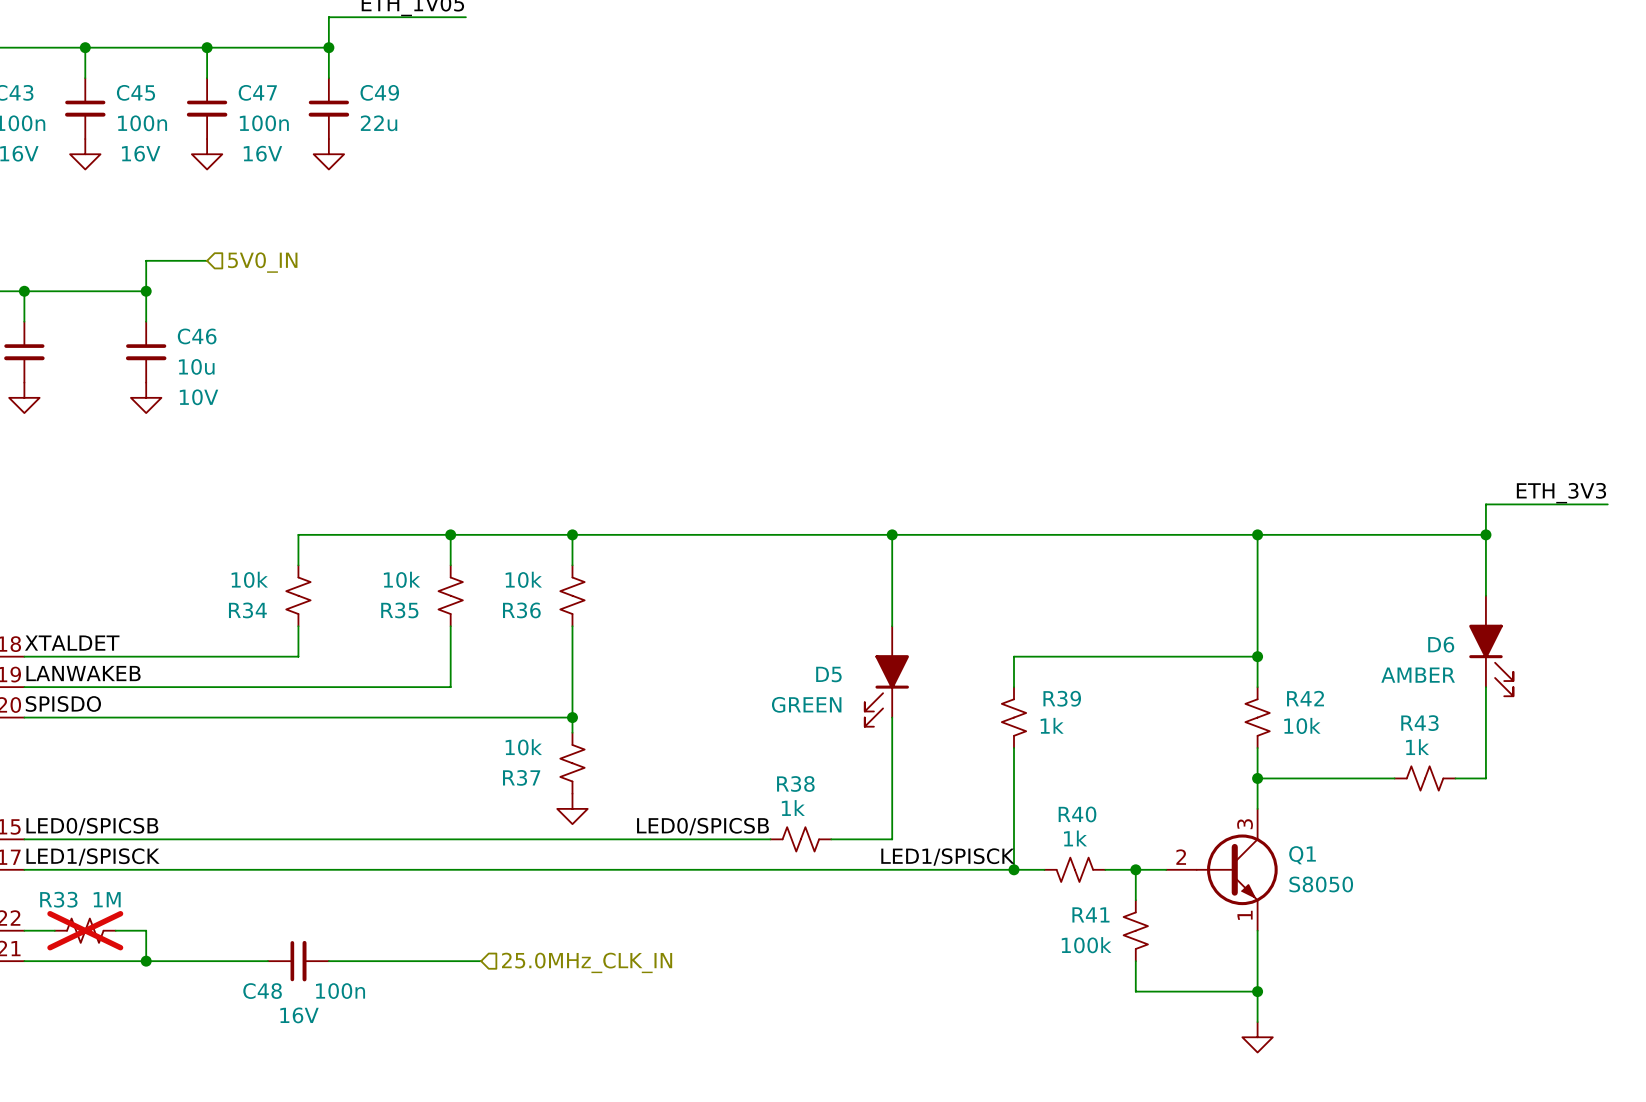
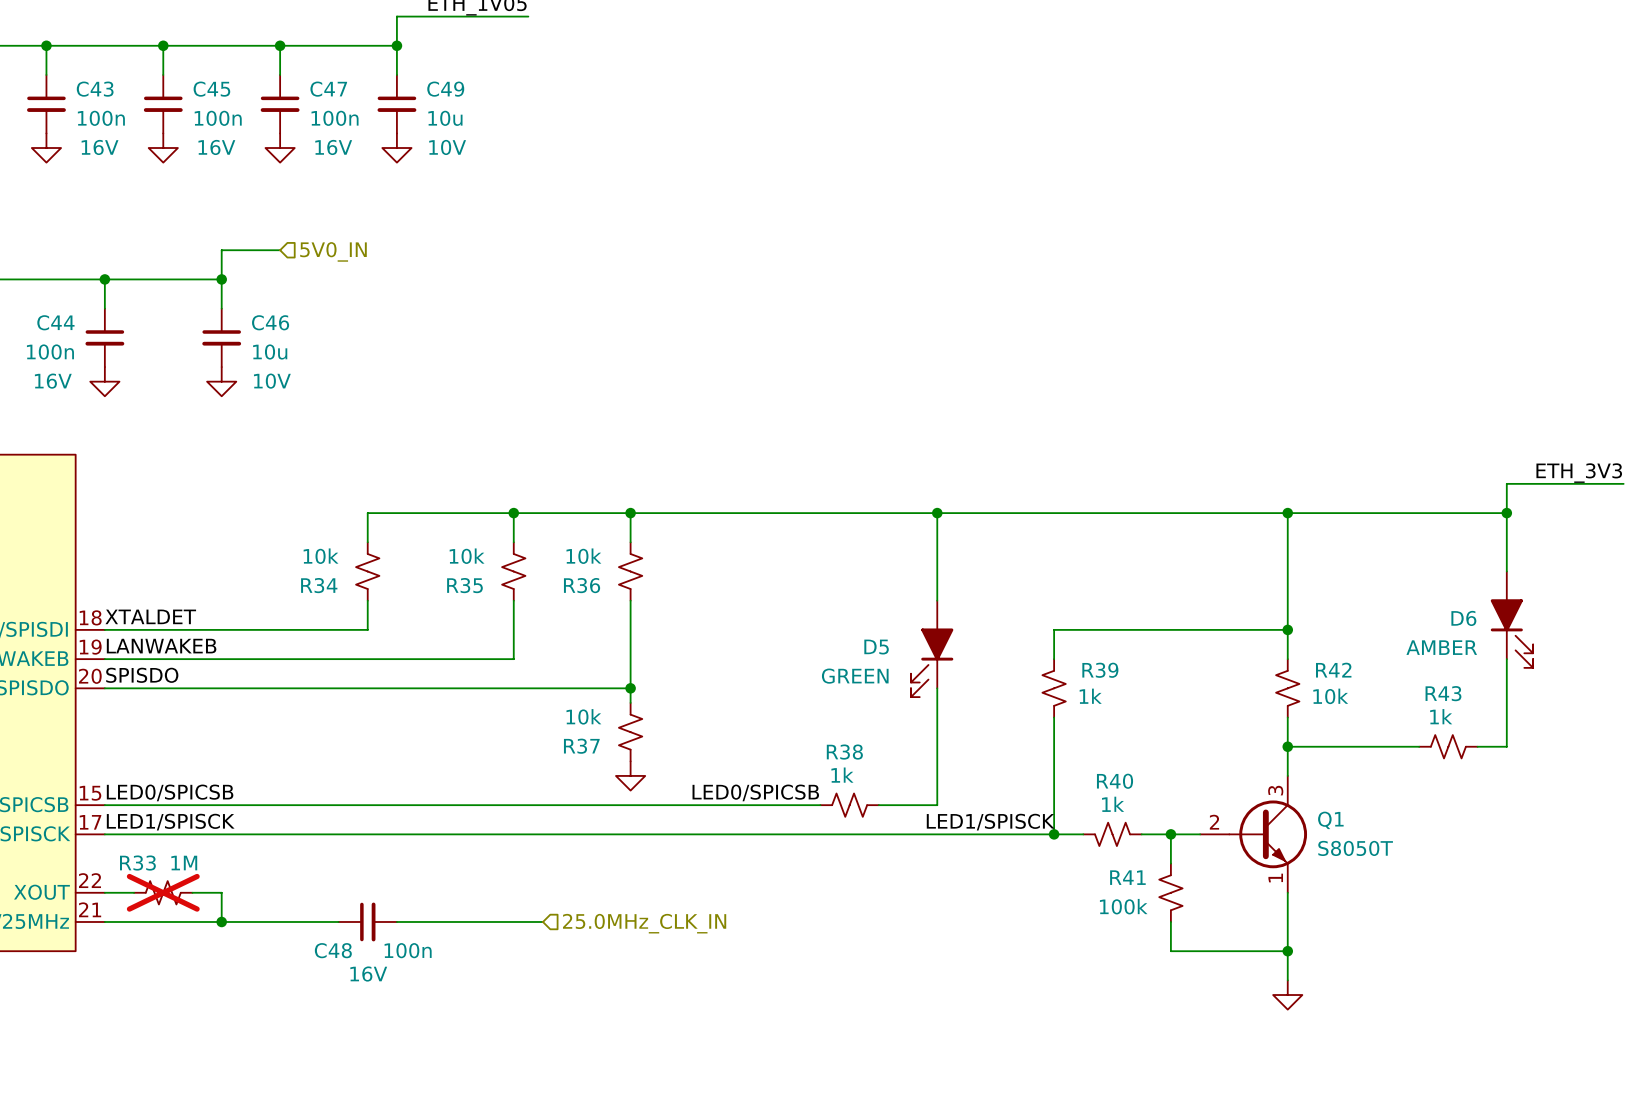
C49 value: 22u (379, 123) -> 10u (445, 118)
C49 text: none -> 10V (447, 147)
Q1 value: S8050 (1321, 884) -> S8050T (1355, 848)

